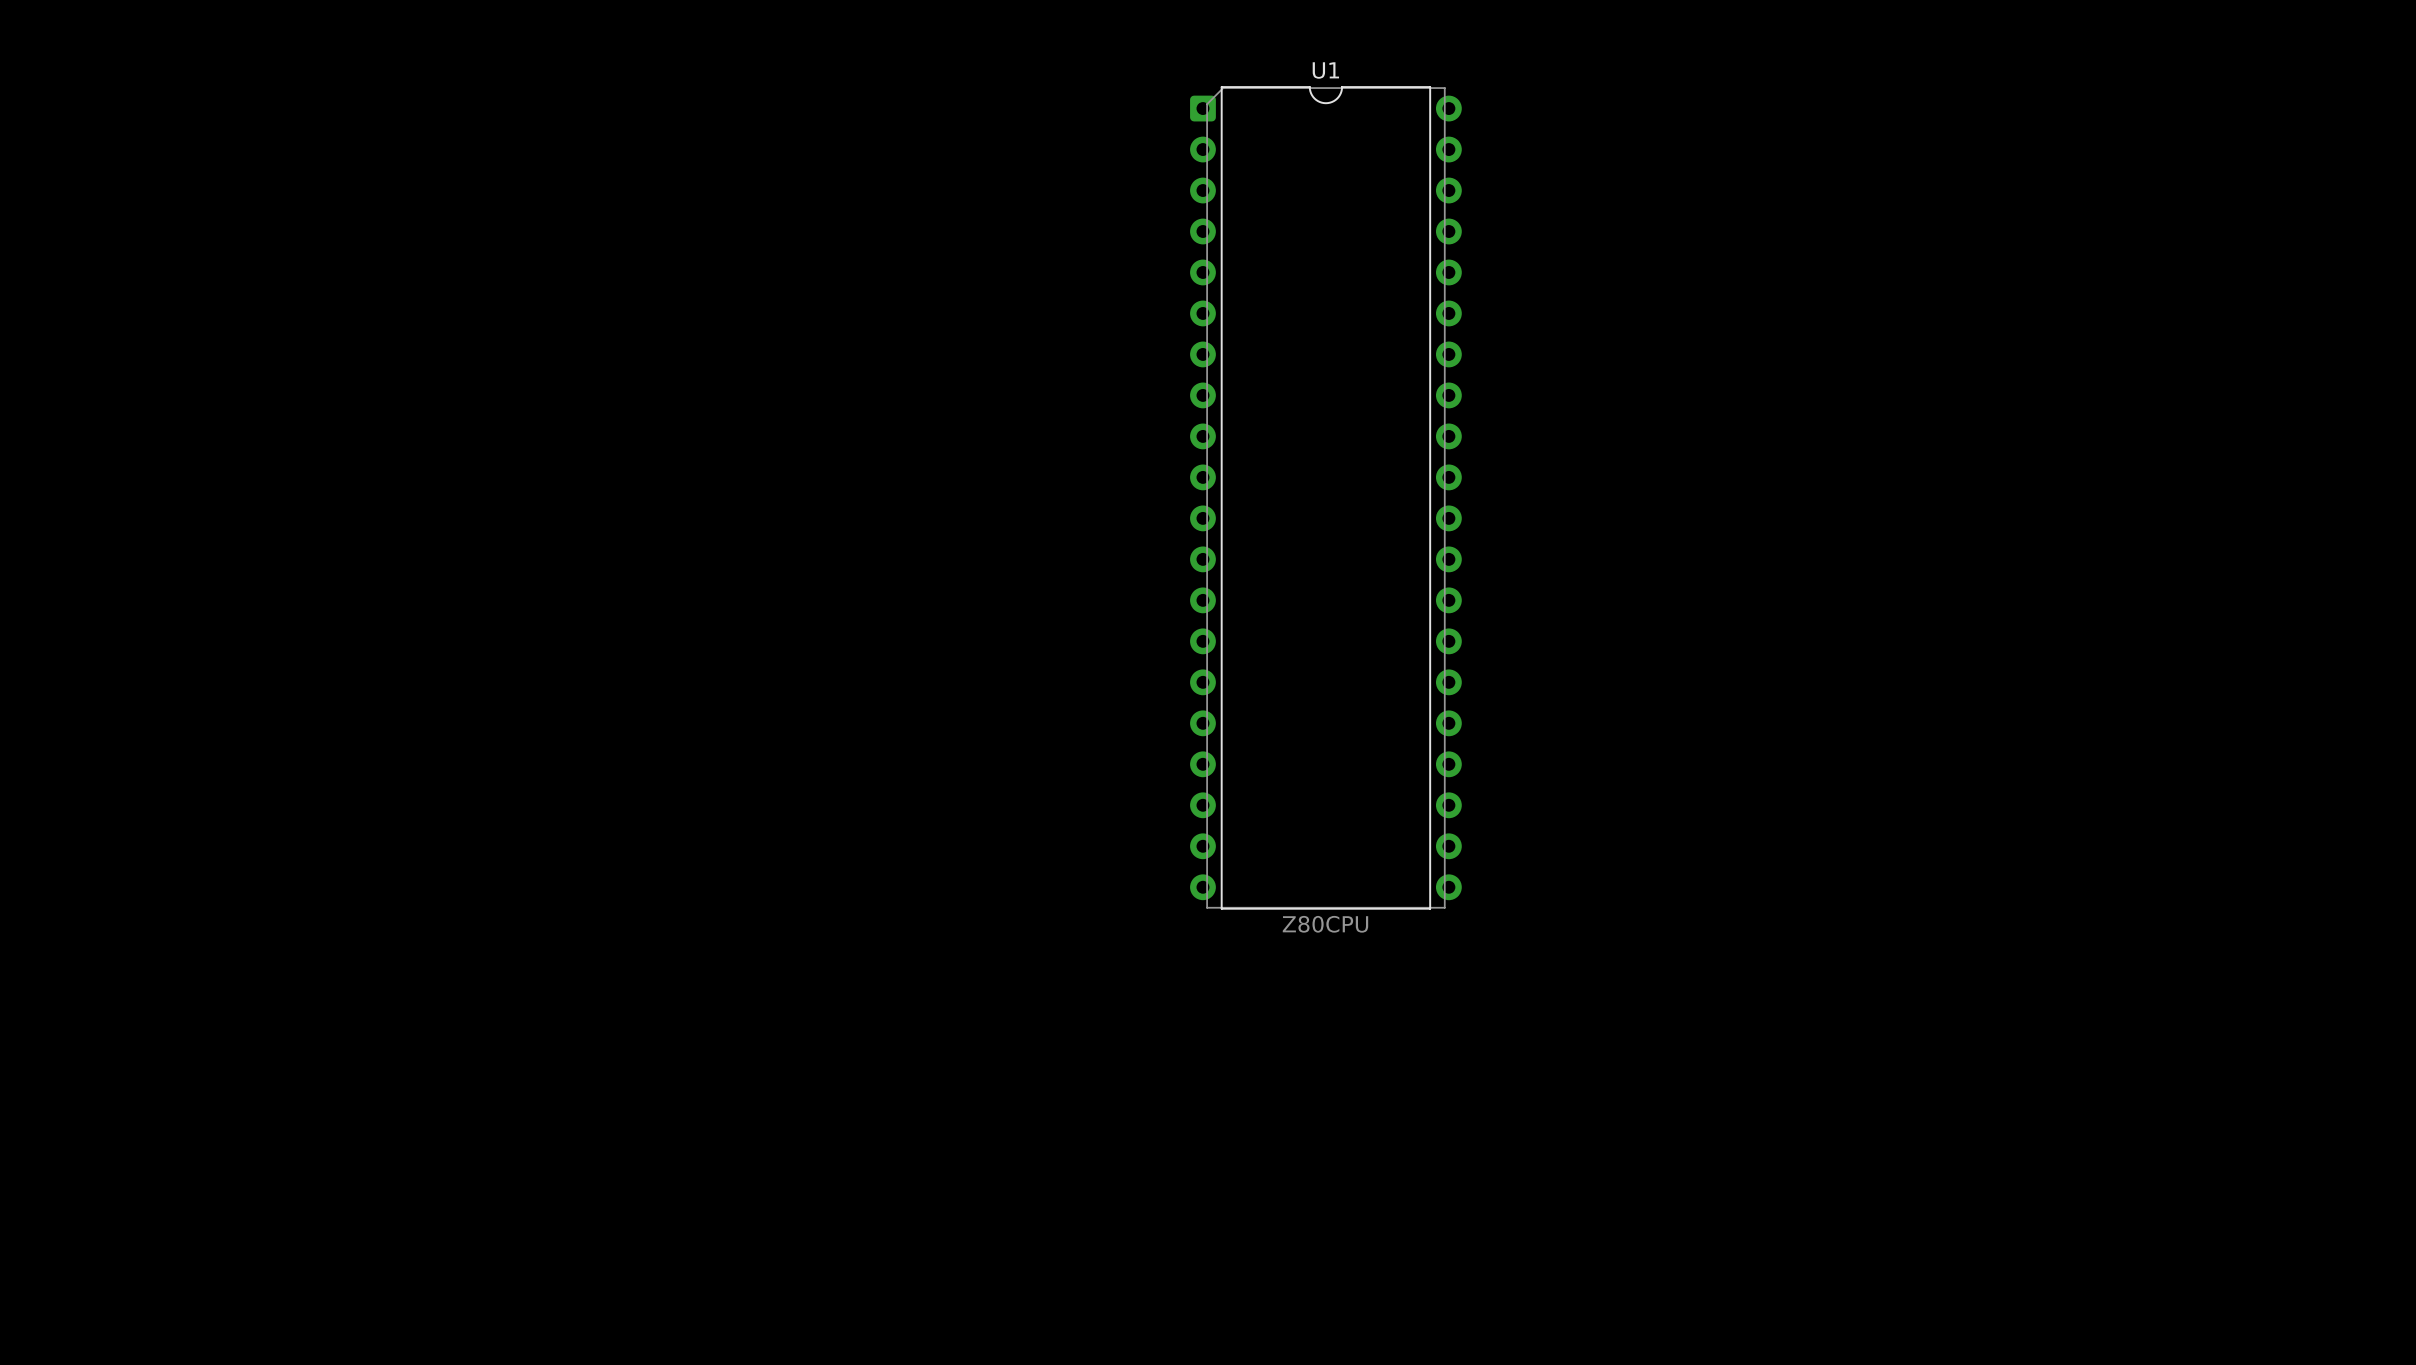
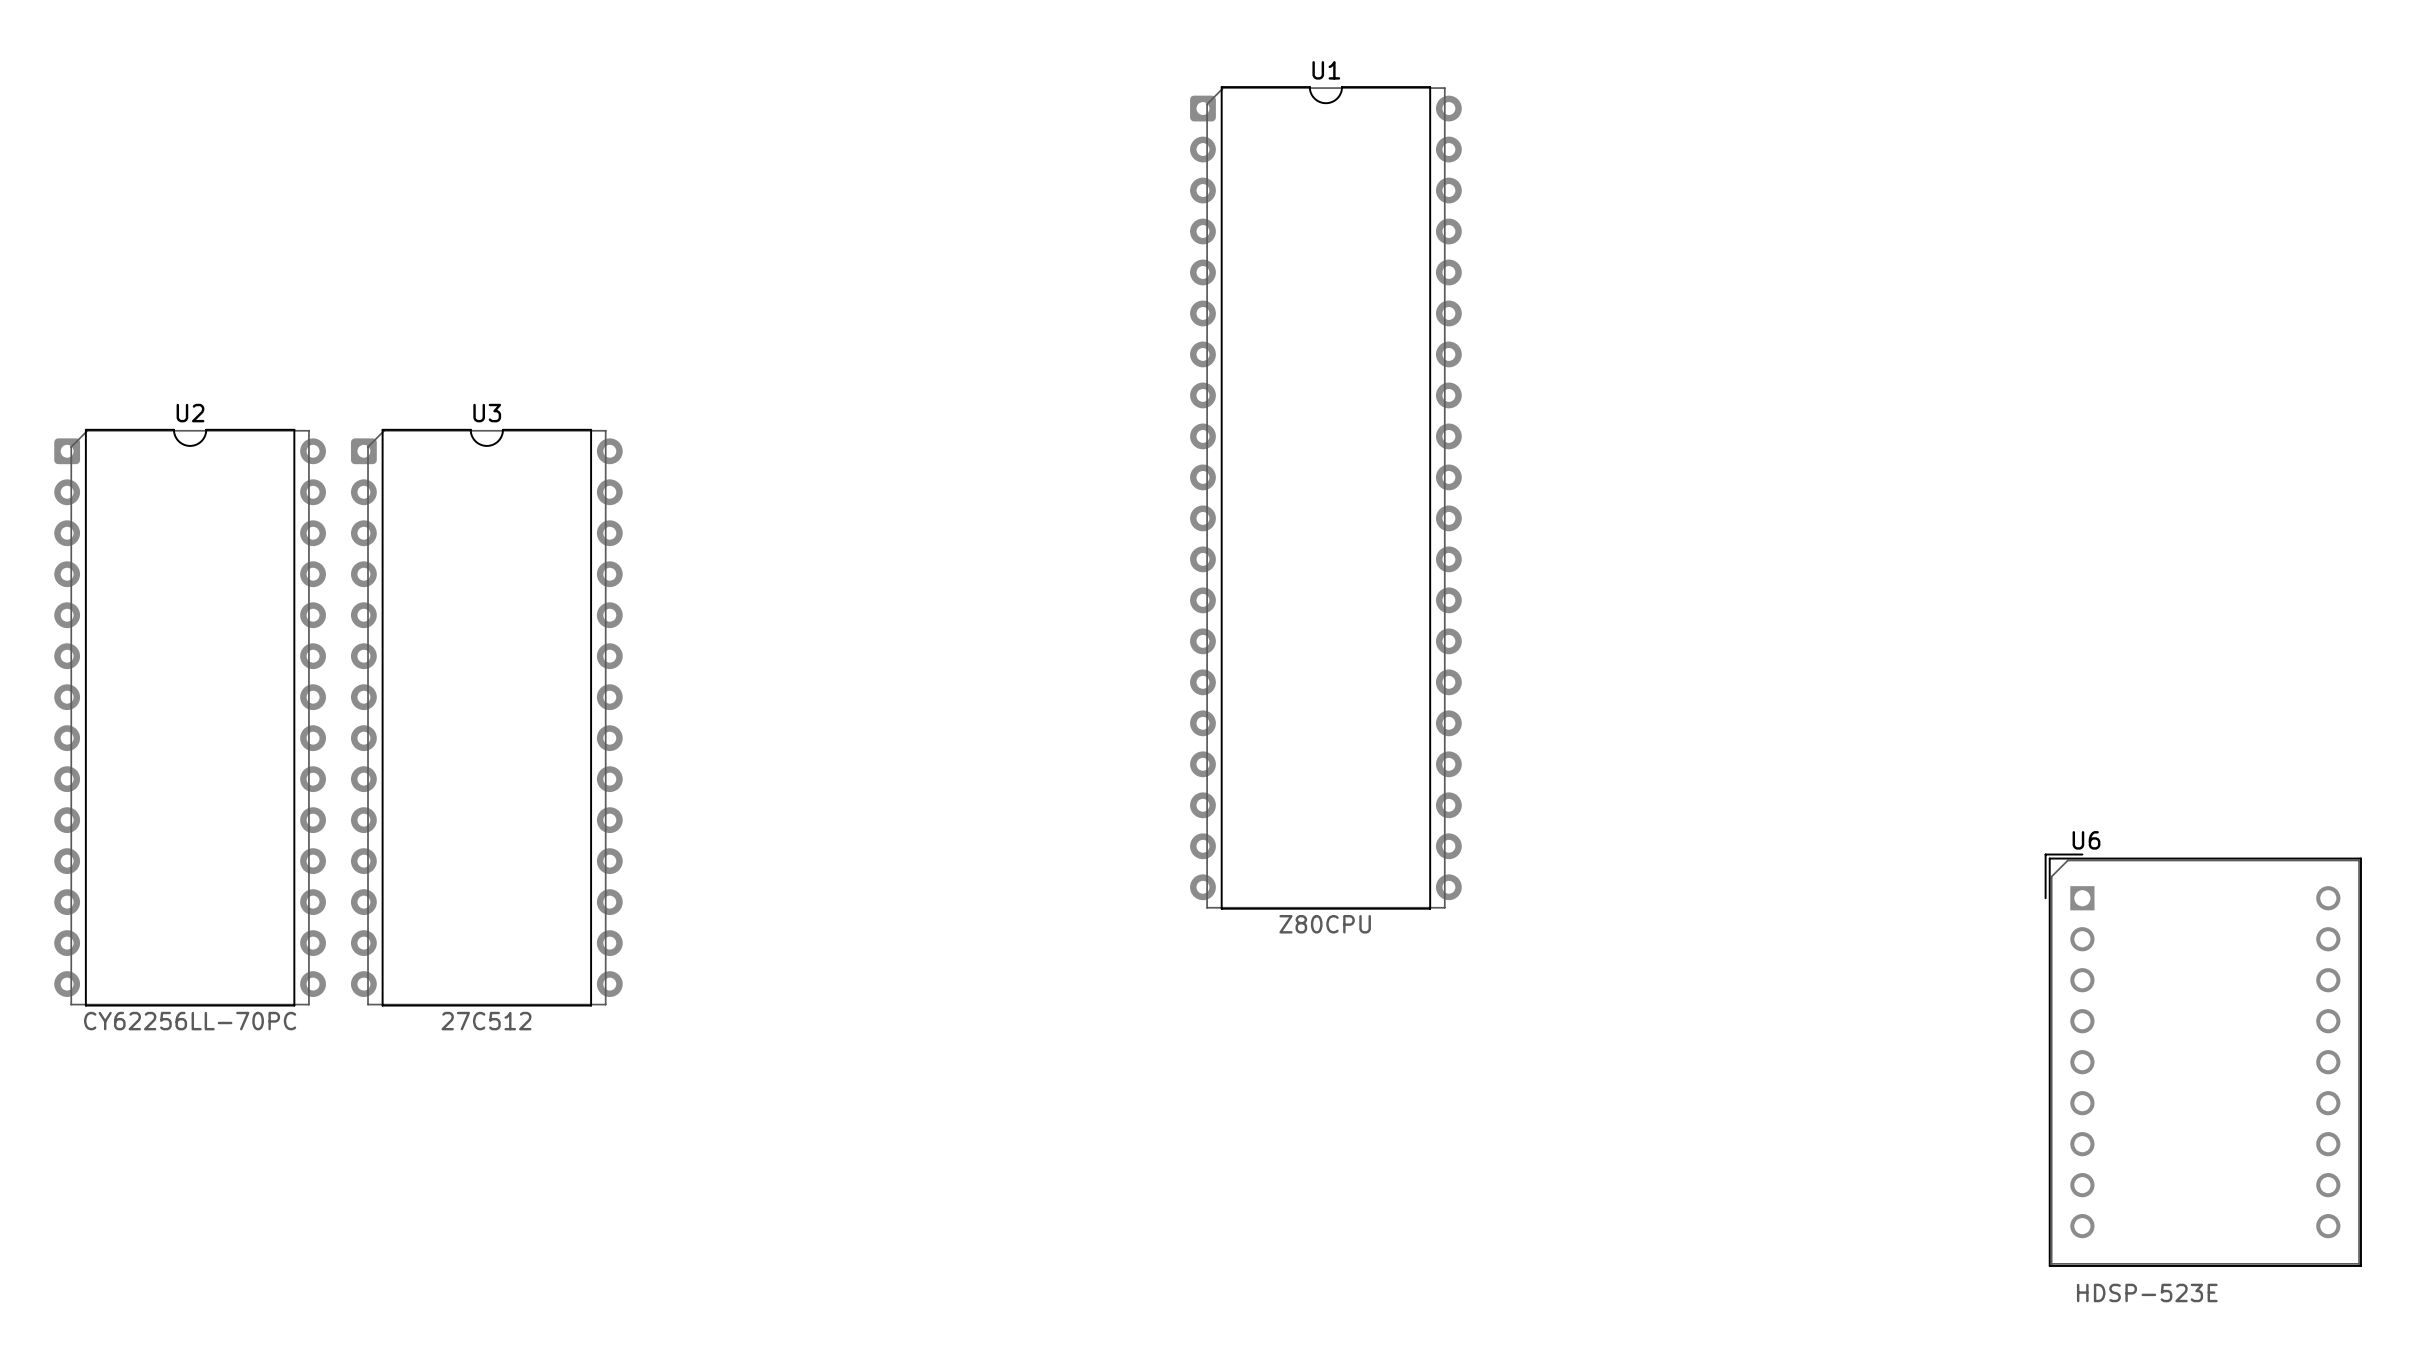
U2: none -> CY62256LL-70PC (190, 717)
U3: none -> 27C512 (486, 717)
U6: none -> HDSP-523E (2203, 1060)

